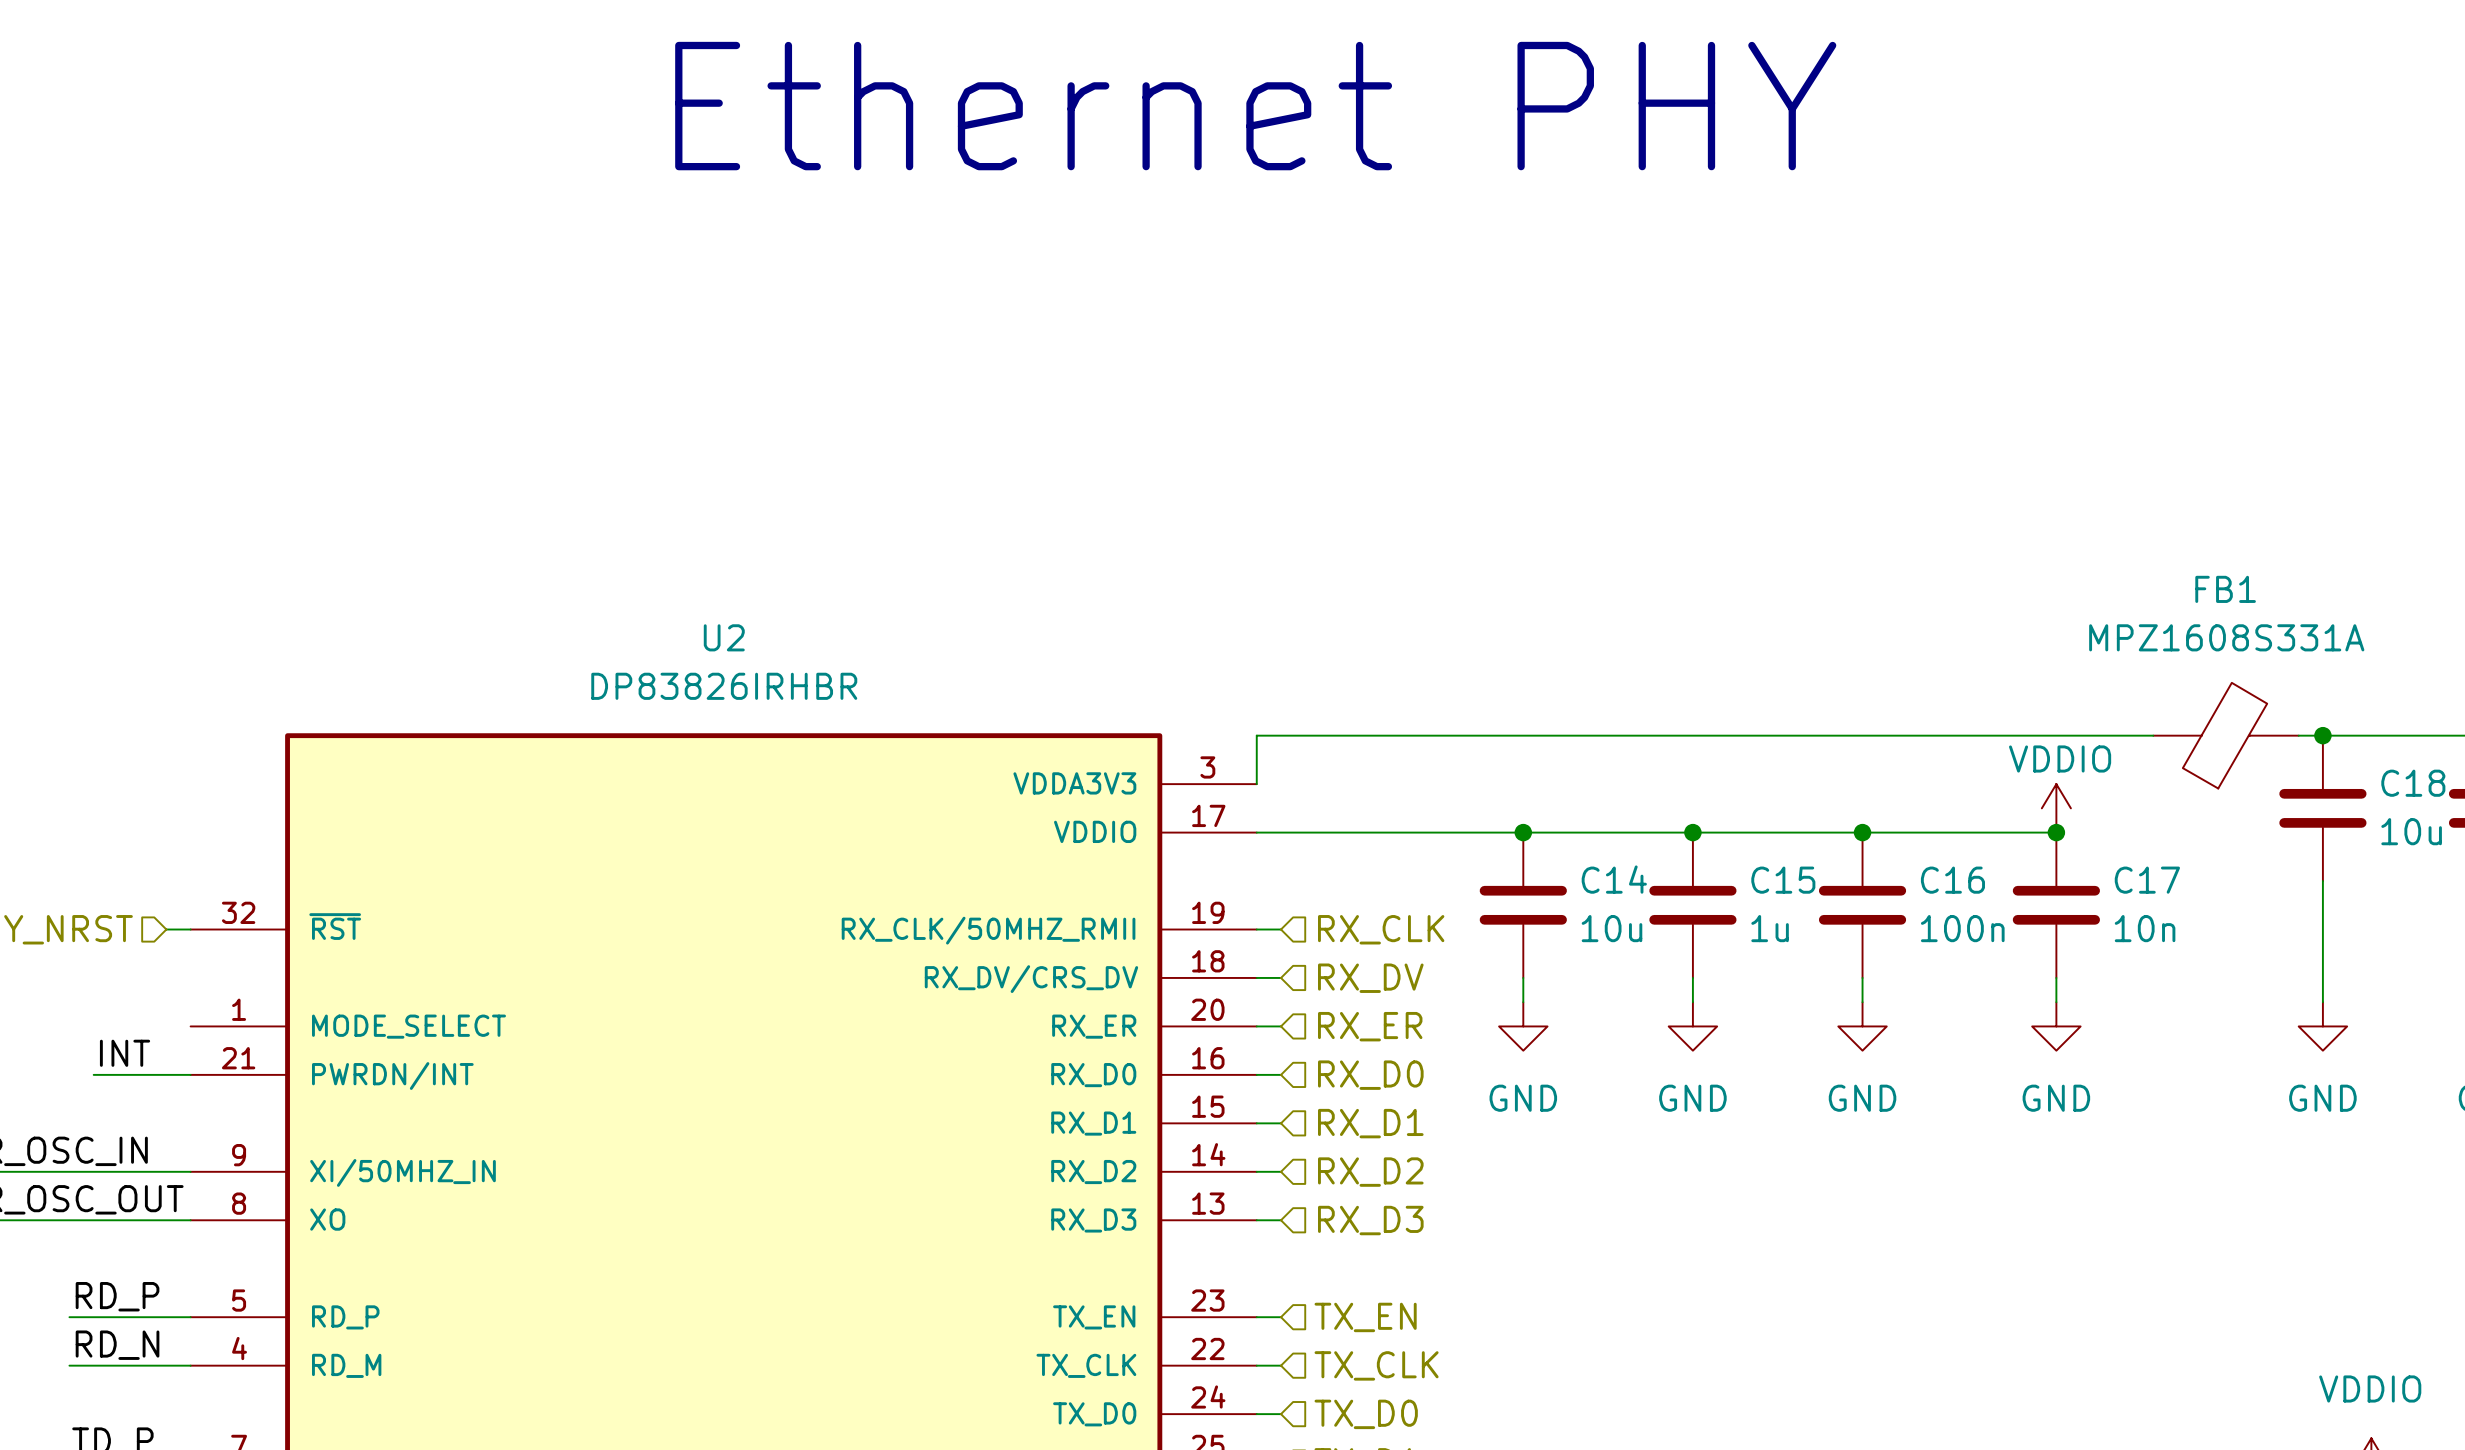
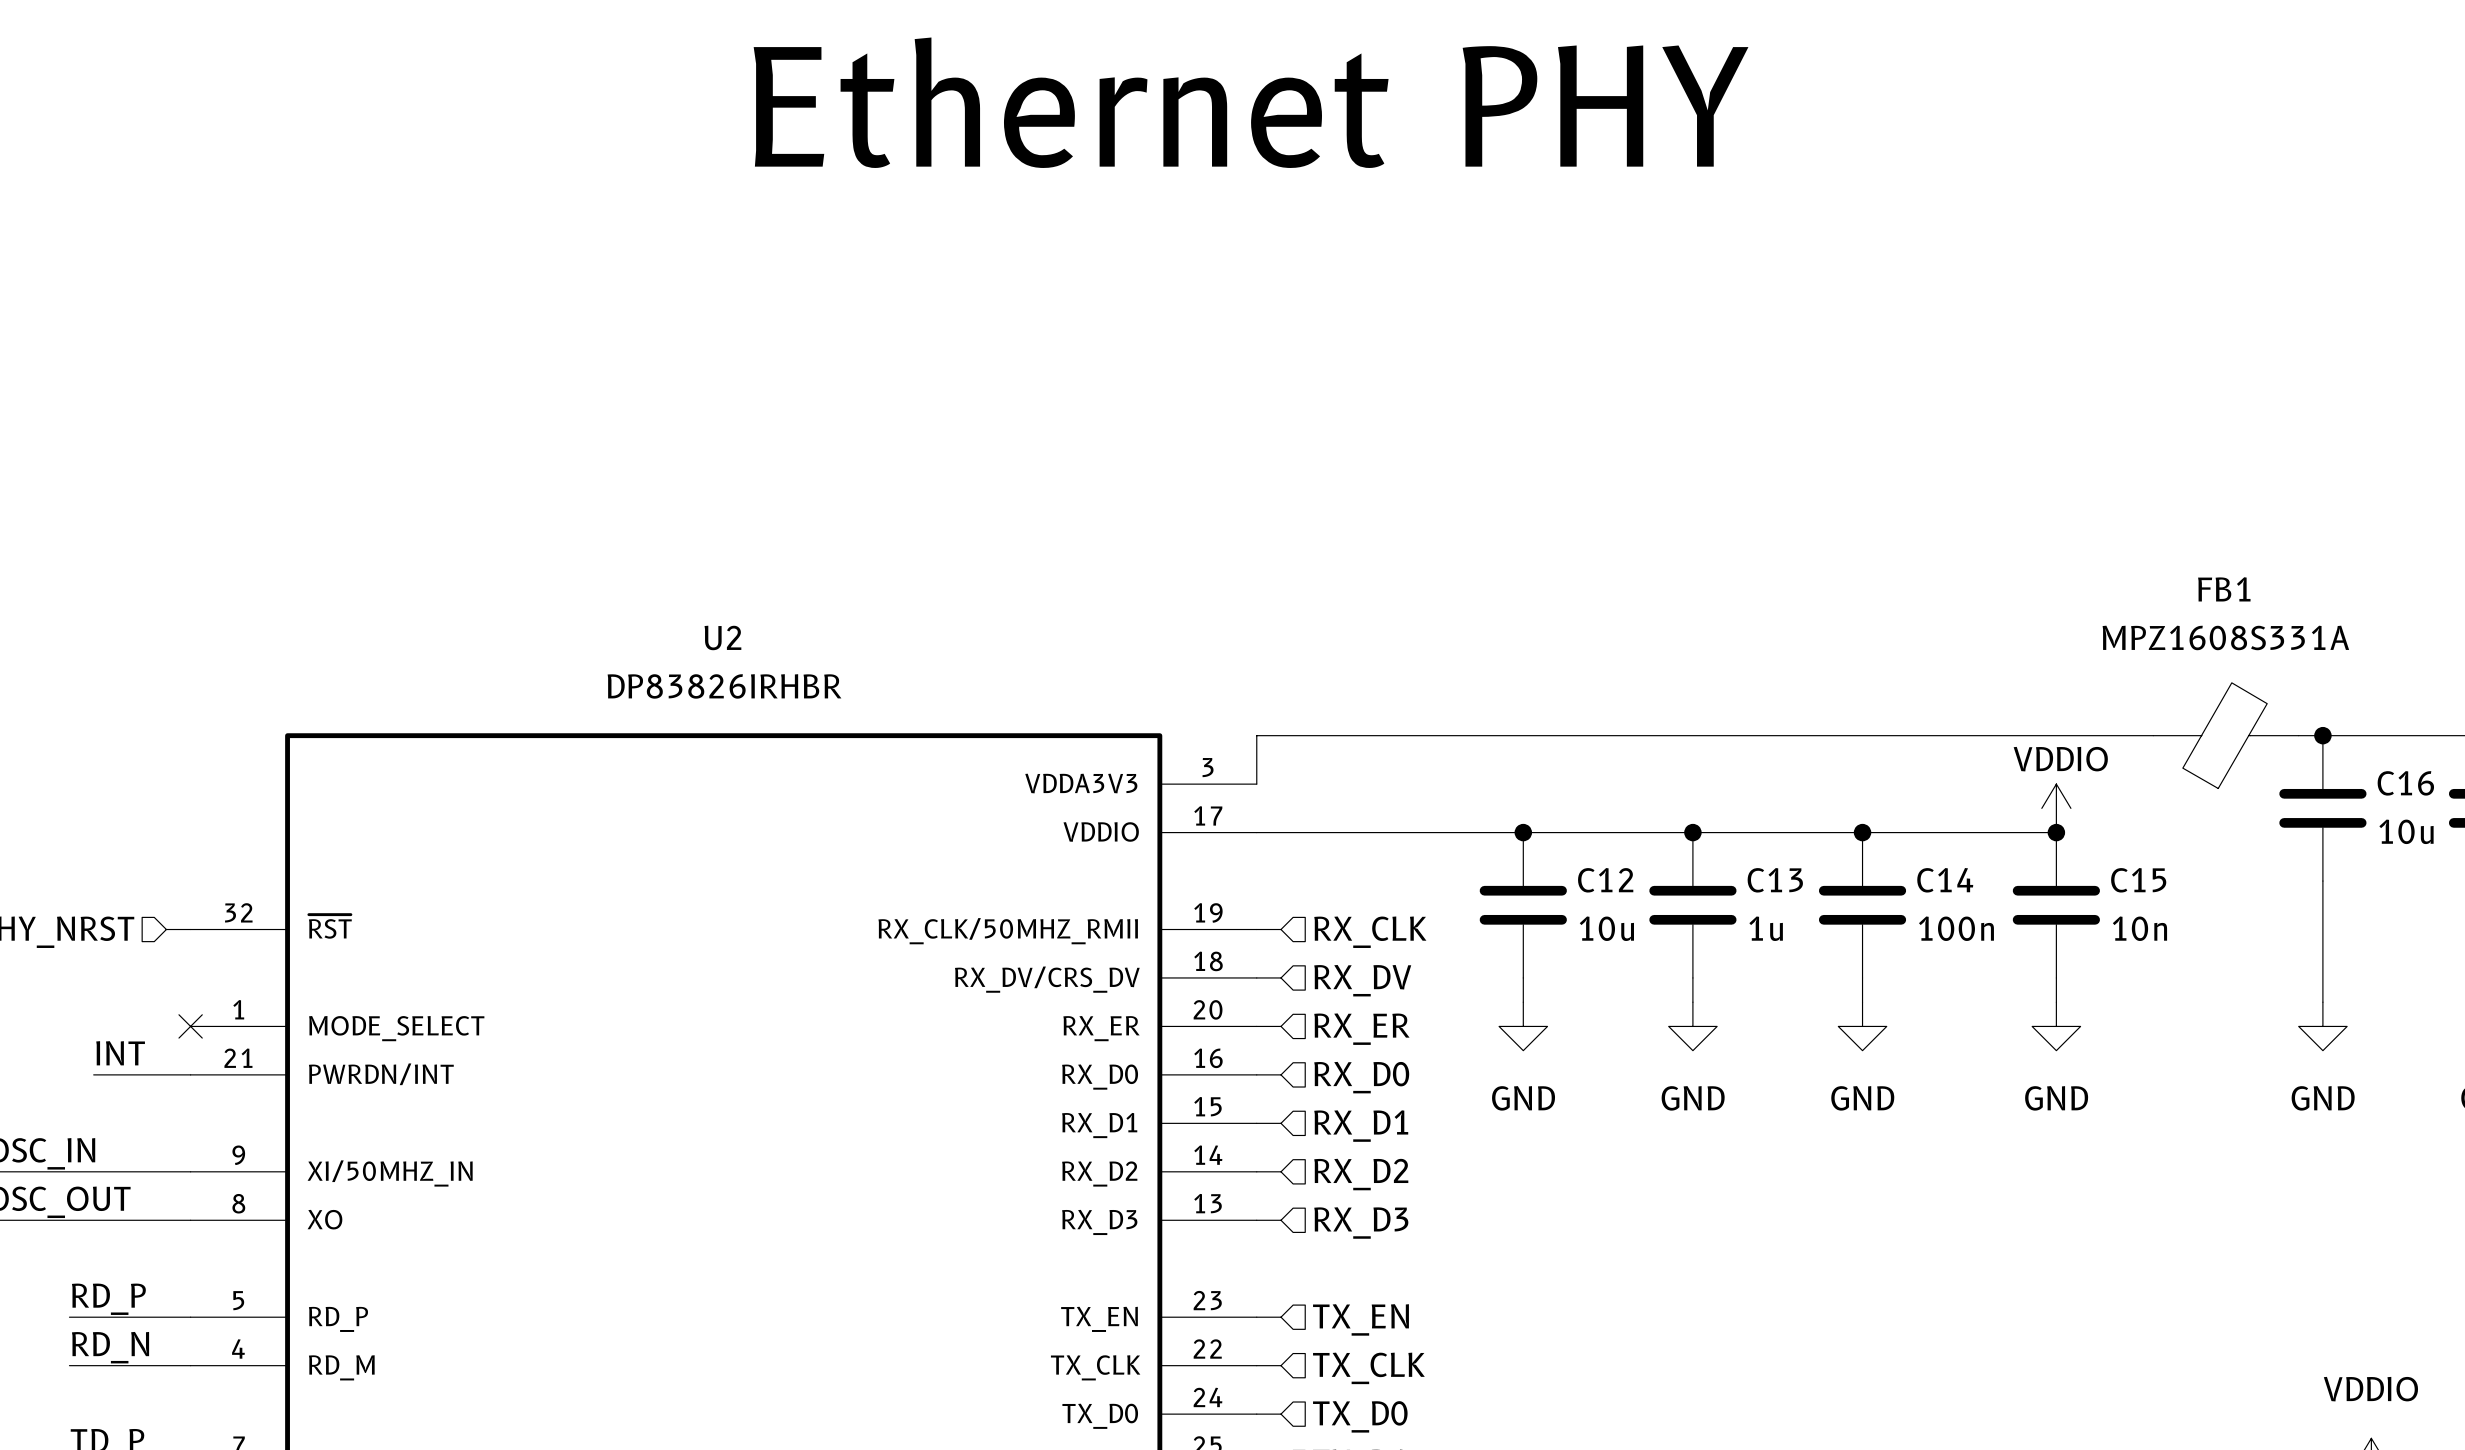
C18 name: C18 (2413, 783) -> C16 (2405, 783)
C14 name: C14 (1614, 879) -> C12 (1605, 880)
C15 name: C15 (1783, 880) -> C13 (1775, 880)
C16 name: C16 (1952, 880) -> C14 (1945, 880)
C17 name: C17 (2147, 880) -> C15 (2138, 880)
no-connect mark: none -> (190, 1026)

